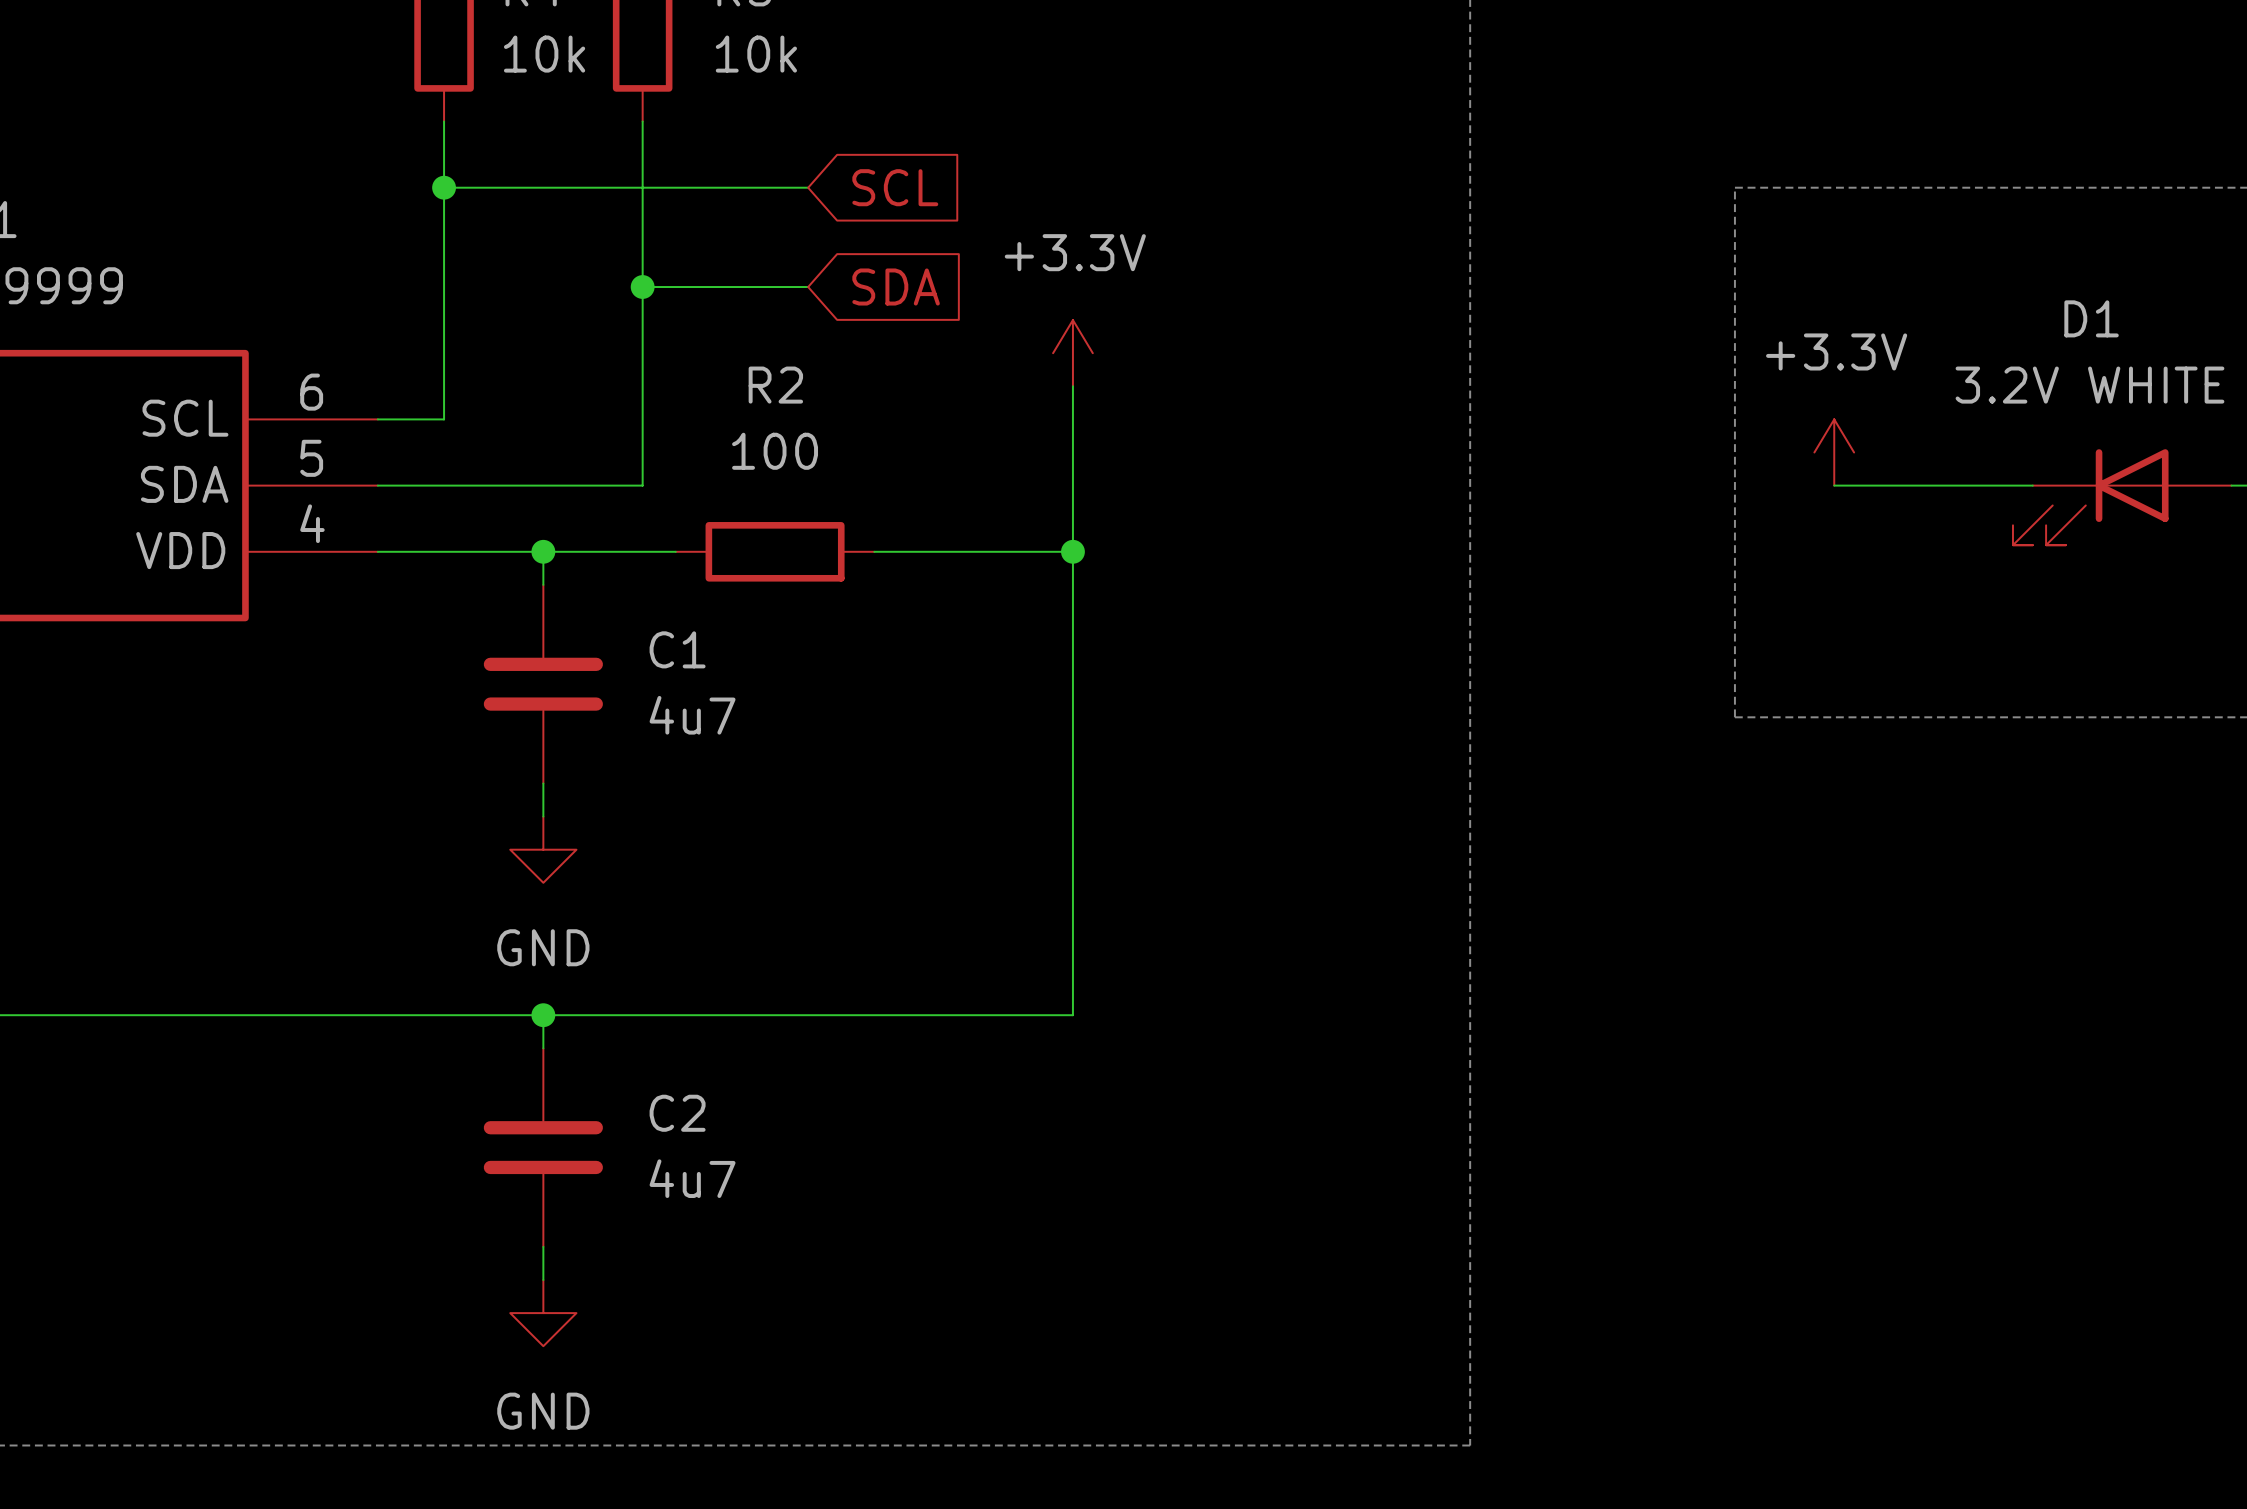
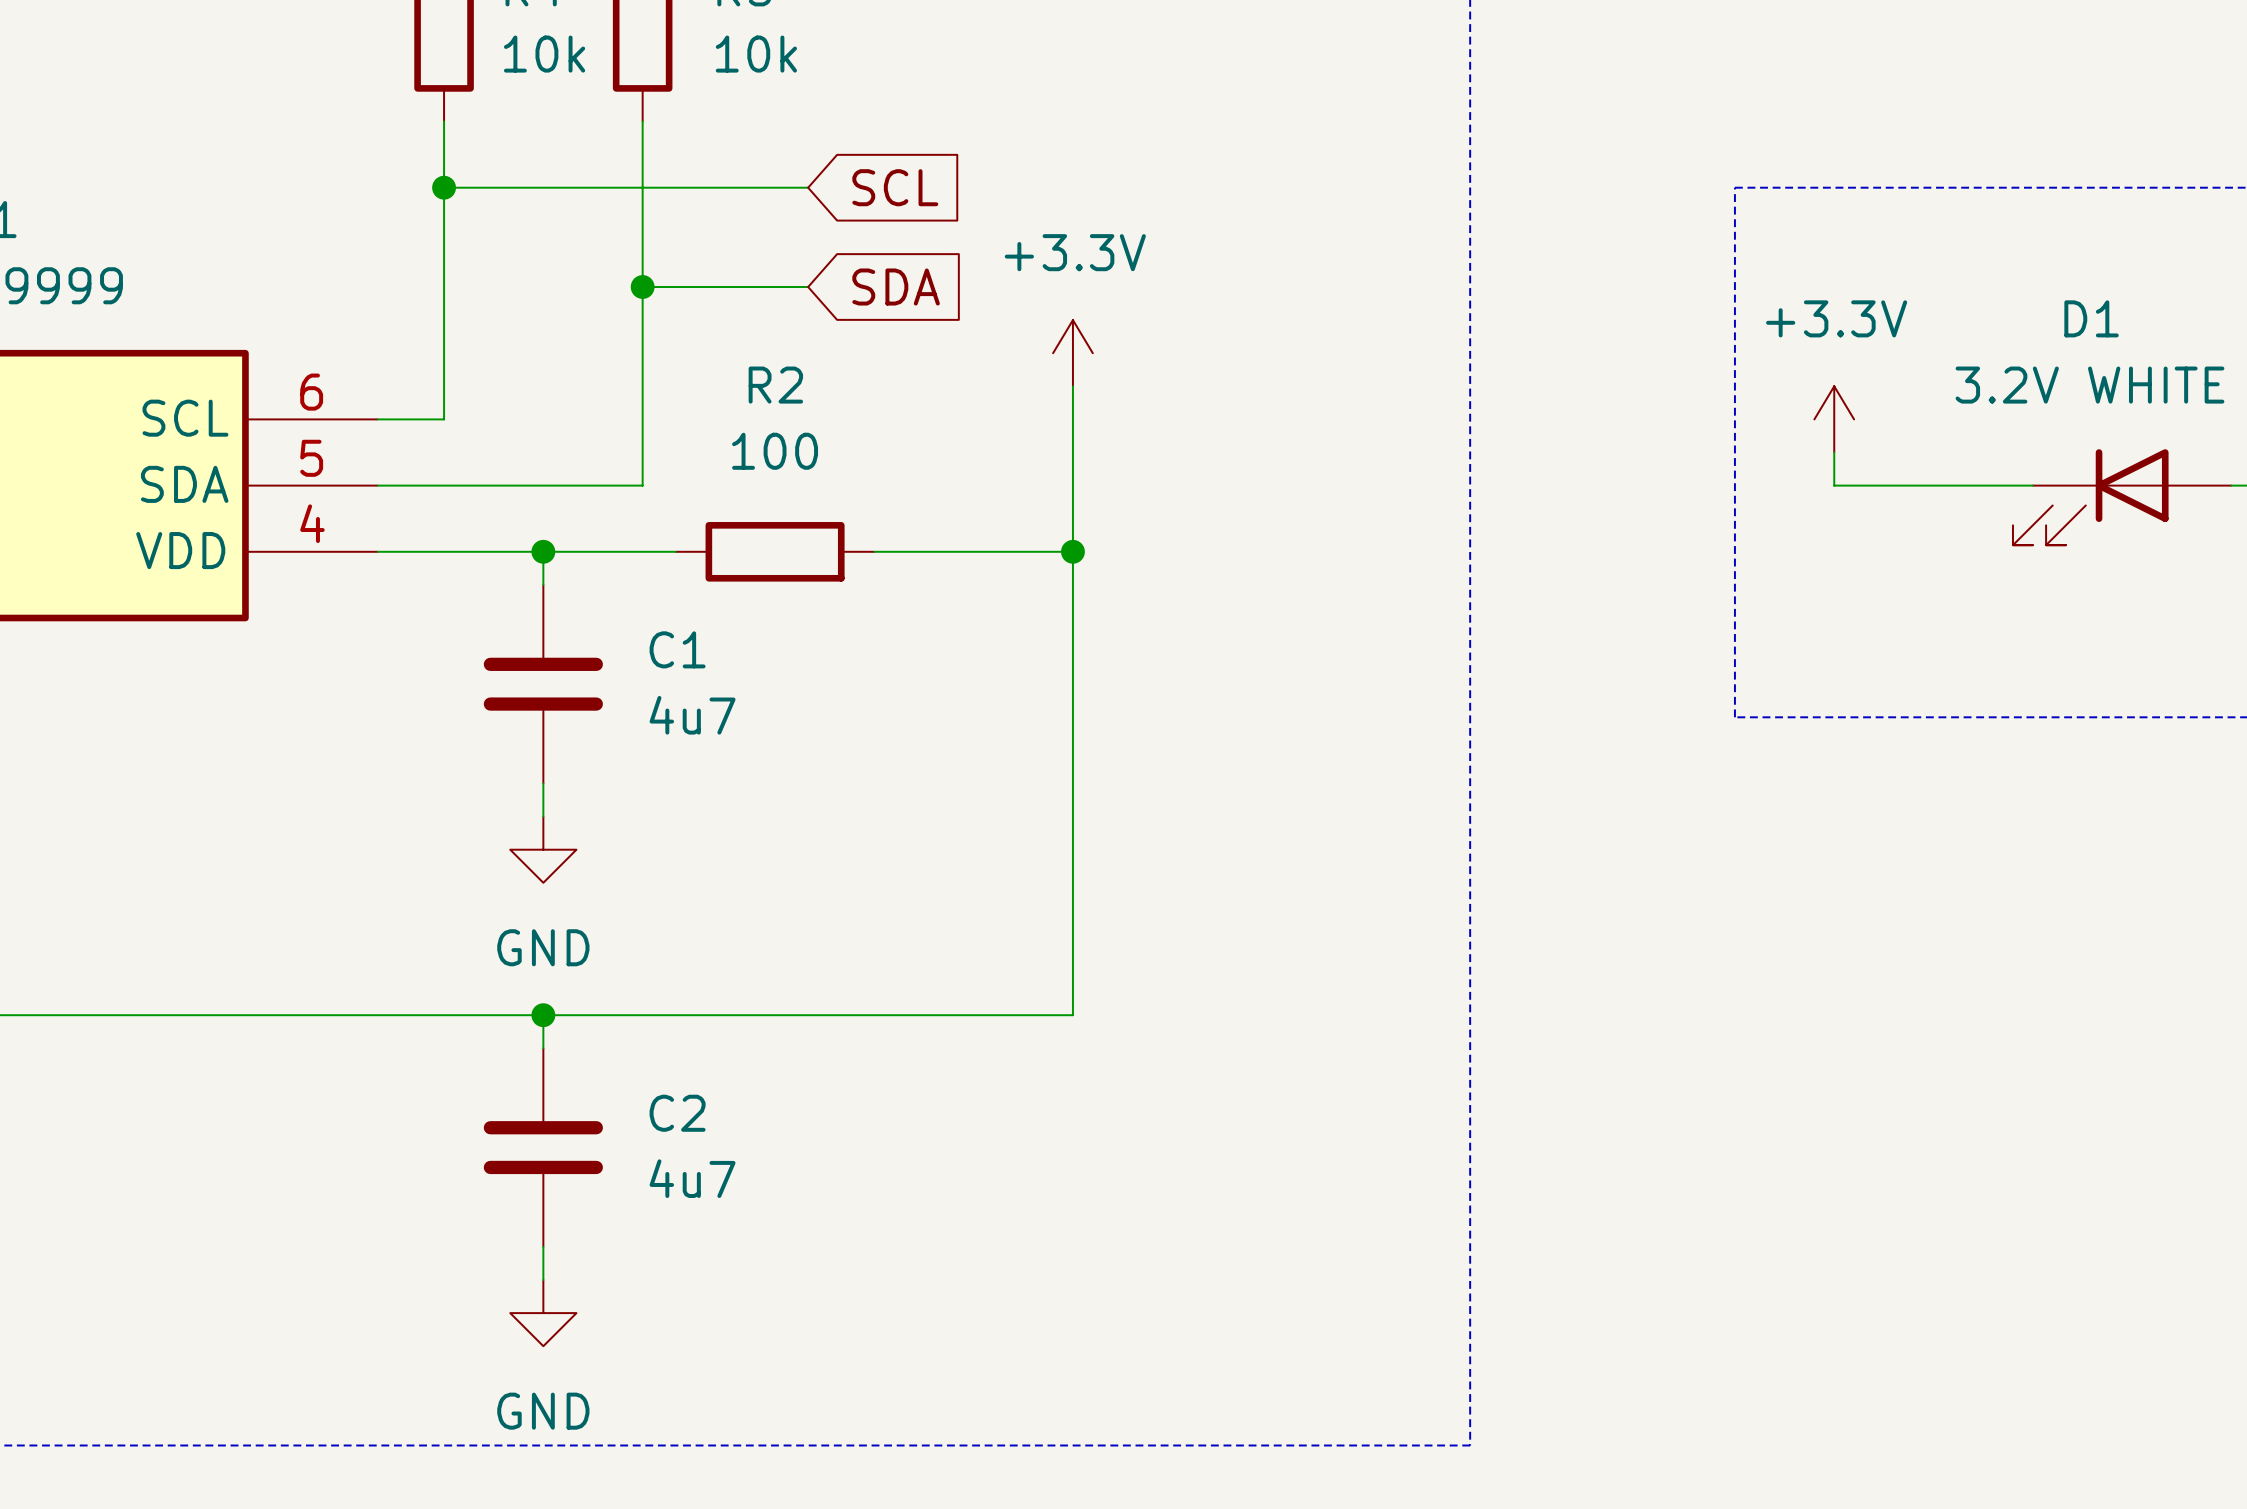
power symbol position: +3.3V (1834, 452) -> +3.3V (1834, 419)

